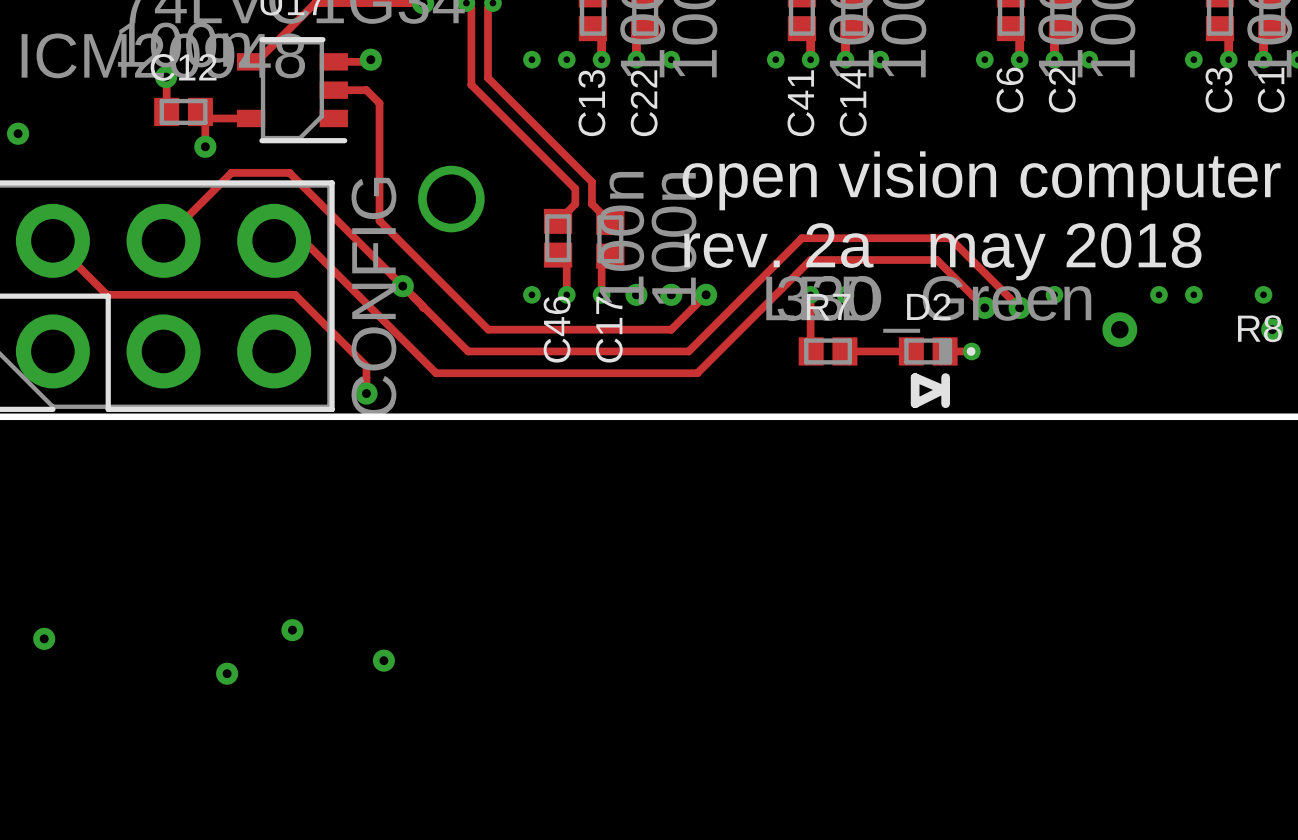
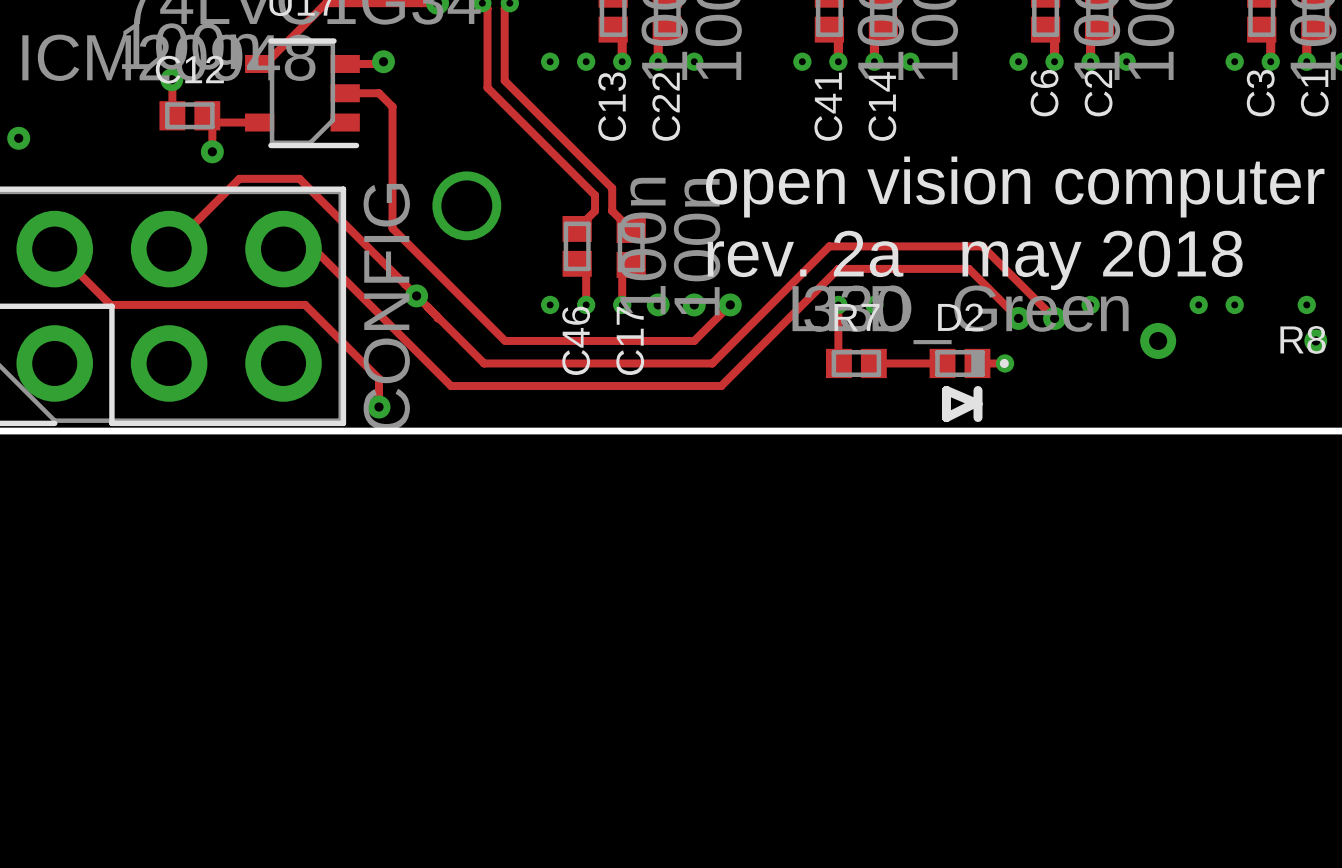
via: (292, 630) -> none
via: (44, 638) -> none
via: (383, 660) -> none
via: (227, 673) -> none

